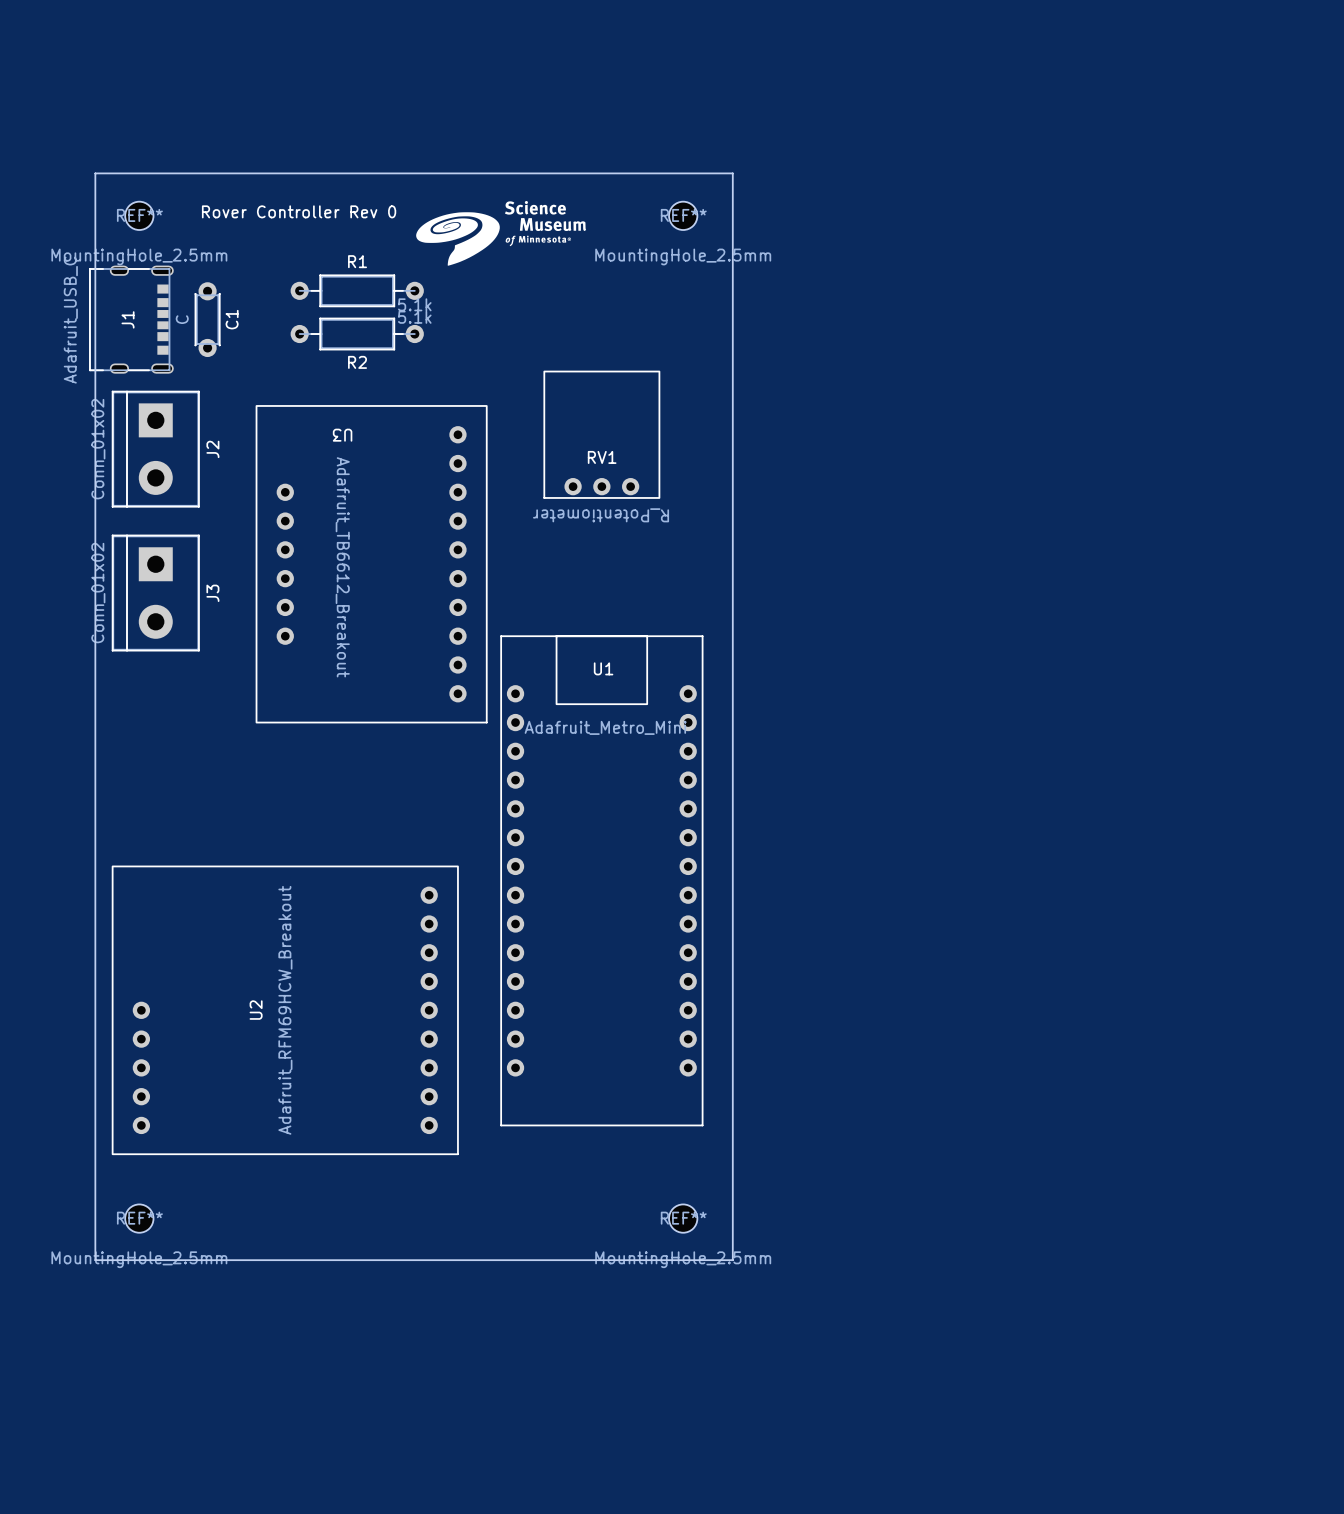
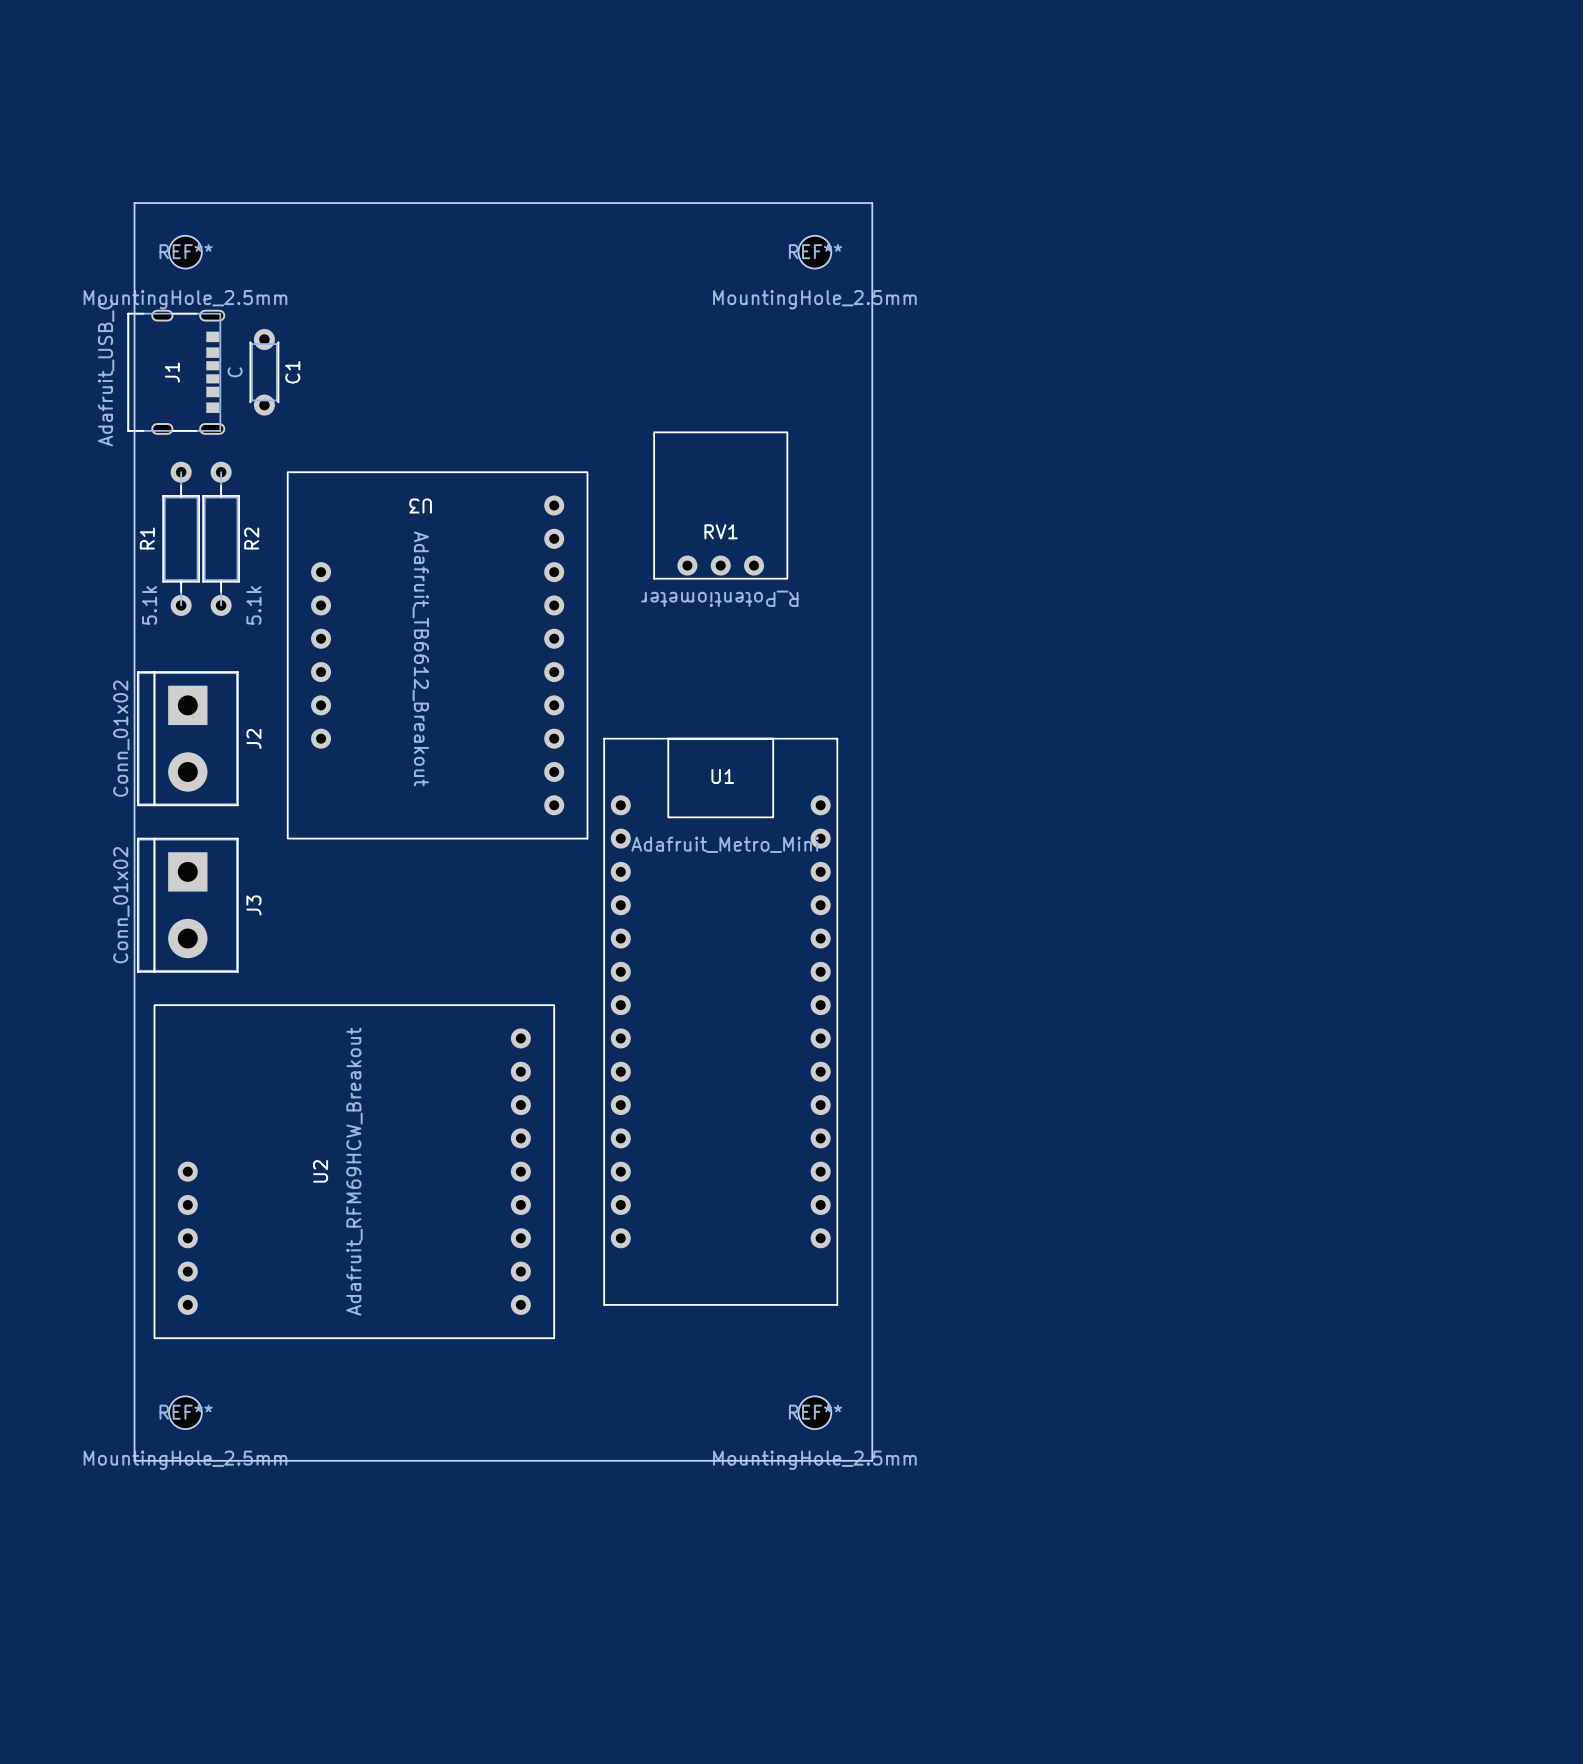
drawing: [416, 201, 587, 266] -> none
text: Rover Controller Rev 0 (299, 211) -> none
R1 name position: R1 (357, 261) -> R1 (147, 538)
R1 rotation: 0° (357, 290) -> 90° clockwise (181, 538)
R1 position: (357, 290) -> (181, 538)
R2 rotation: 0° (357, 334) -> 90° clockwise (221, 538)
R2 position: (357, 334) -> (221, 538)
R2 name position: R2 (357, 362) -> R2 (251, 538)
U3 footprint: [255, 405, 488, 724] -> [286, 471, 589, 840]
J2 position: (155, 449) -> (187, 738)
J3 position: (155, 593) -> (187, 905)

